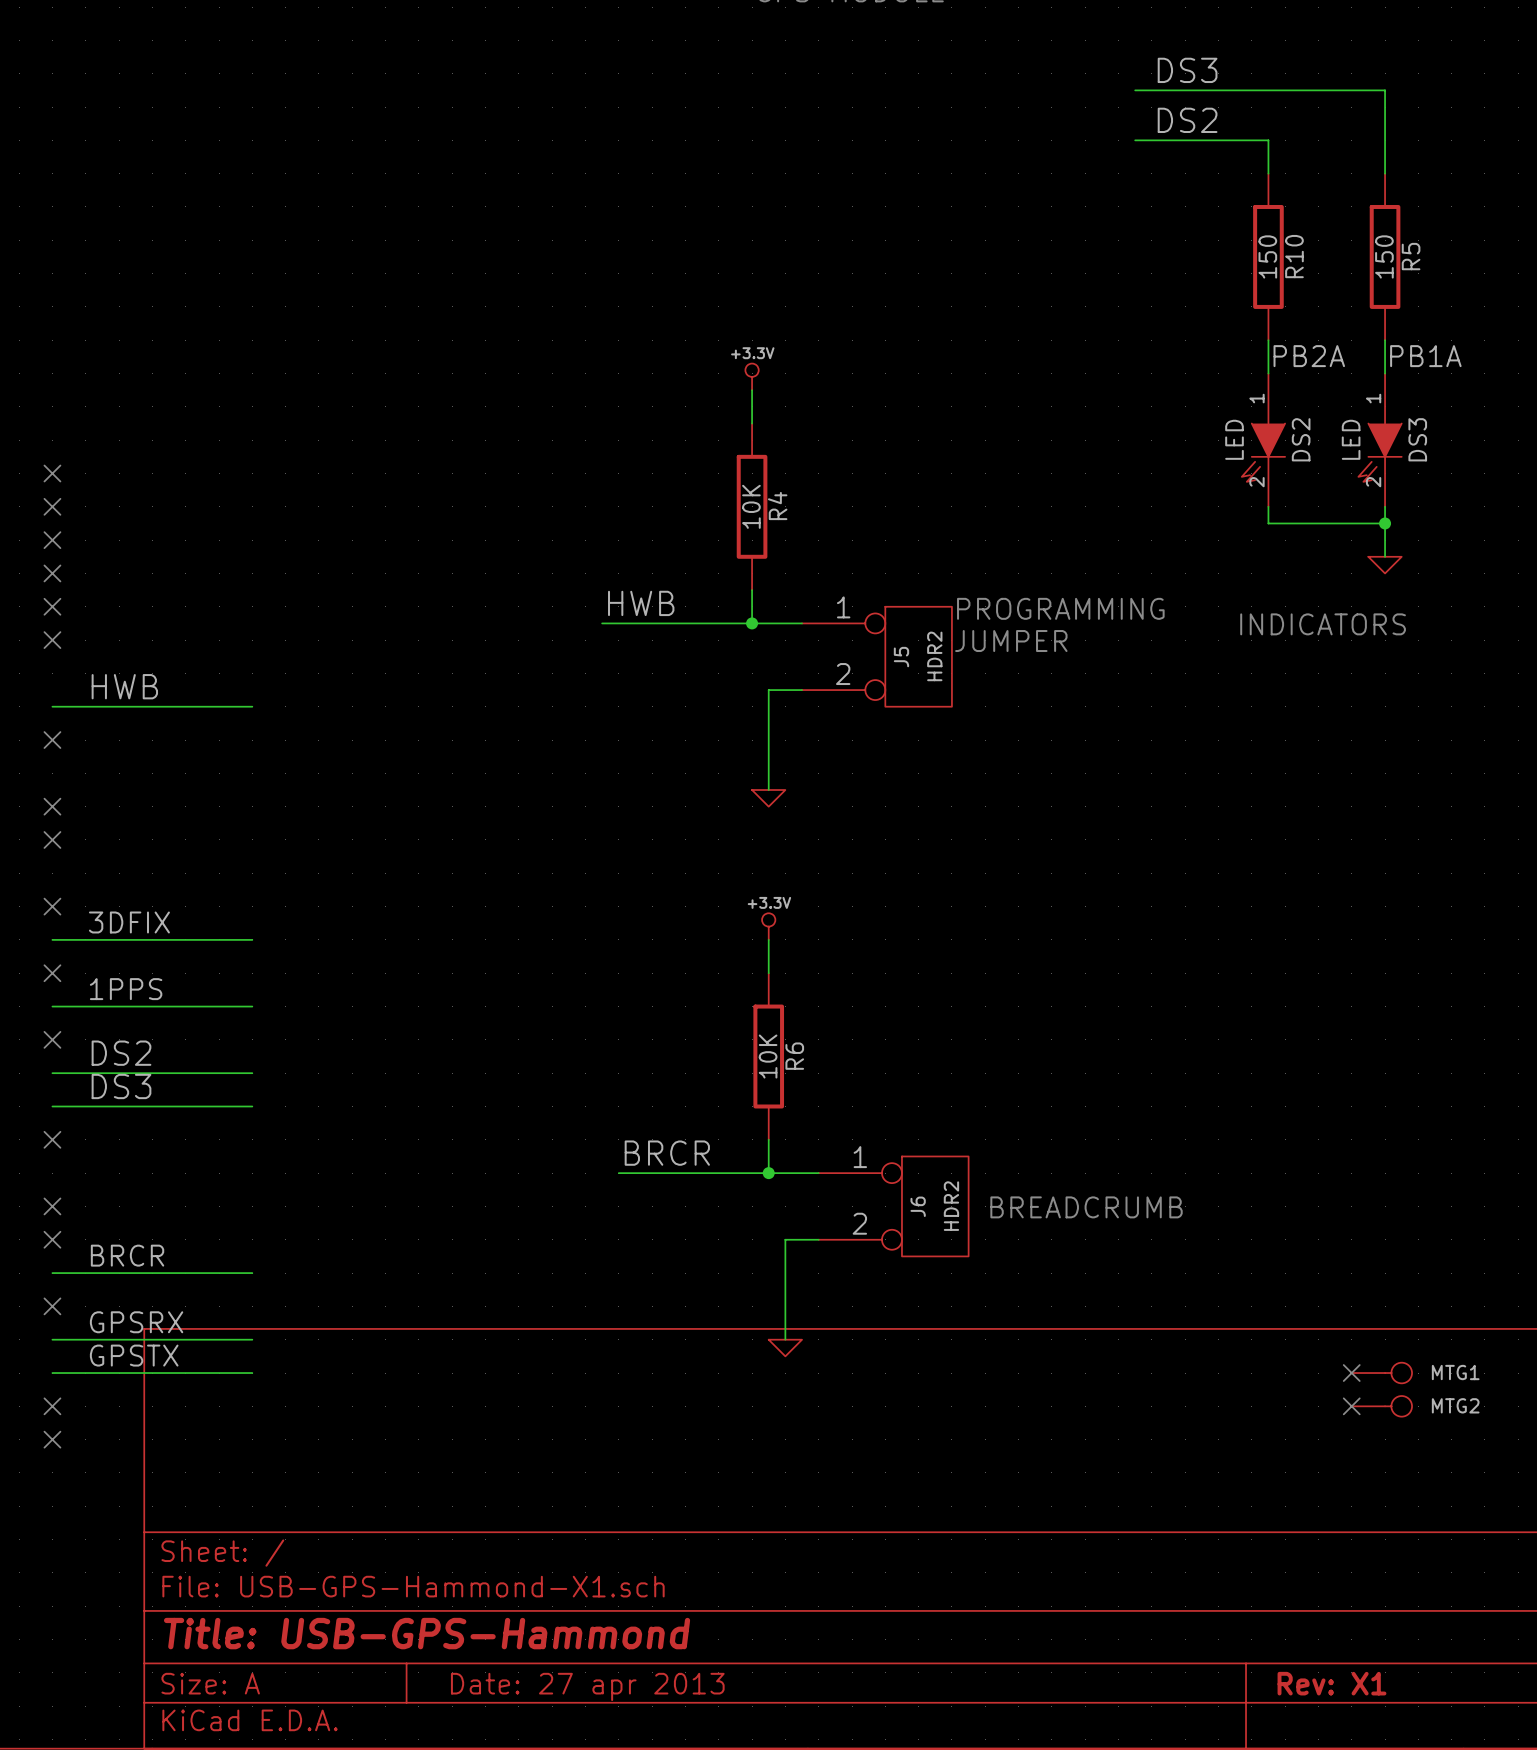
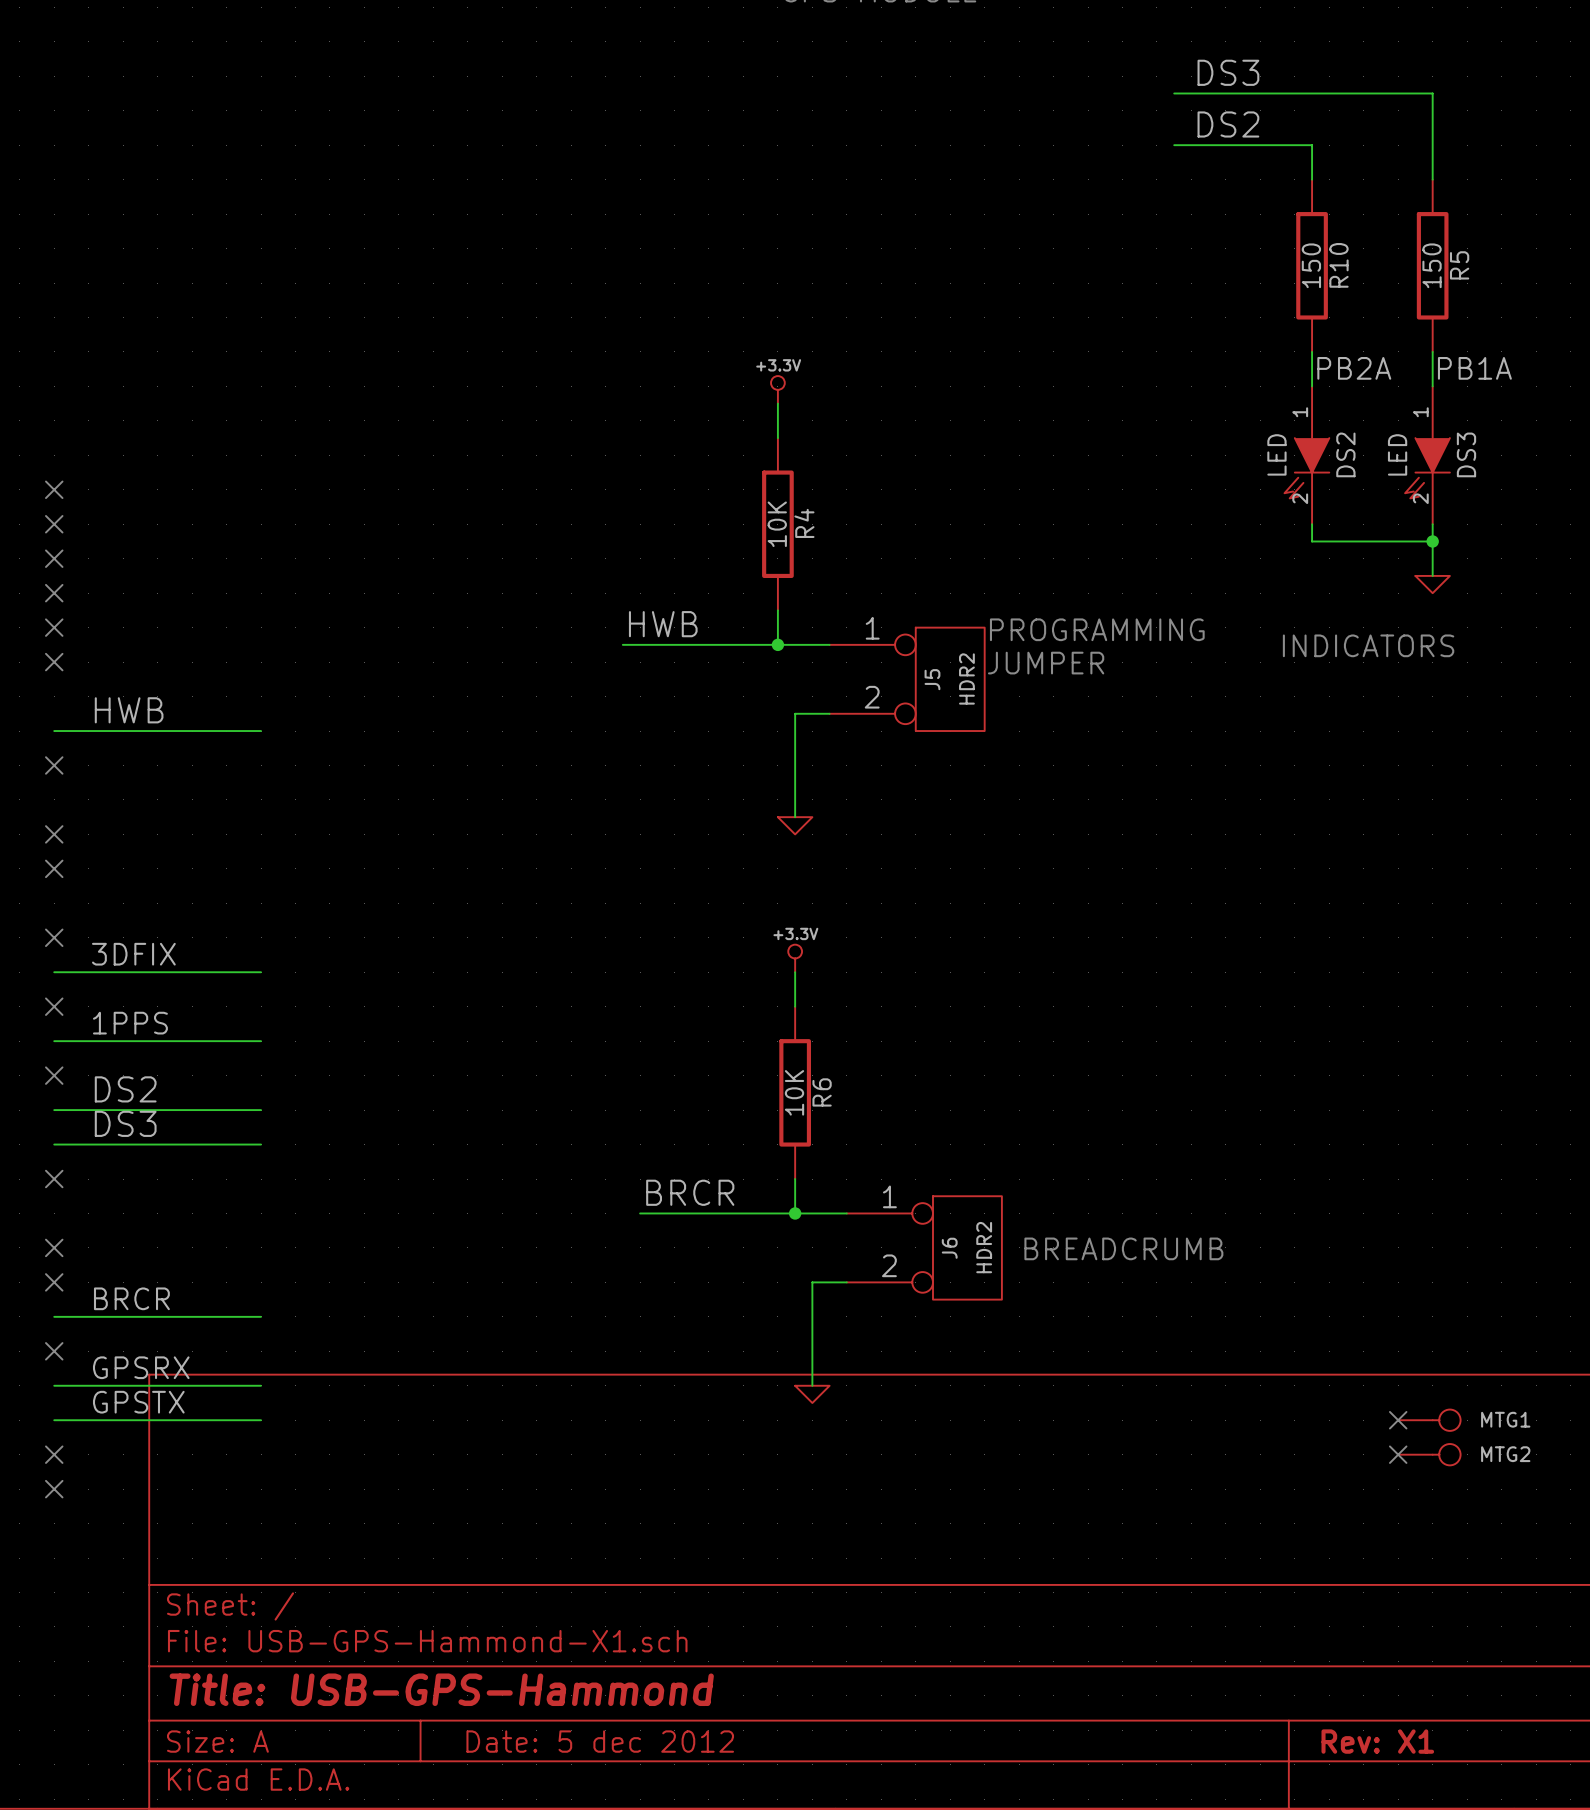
title block: Date: 27 apr 2013 (587, 1686) -> Date: 5 dec 2012 (600, 1741)

